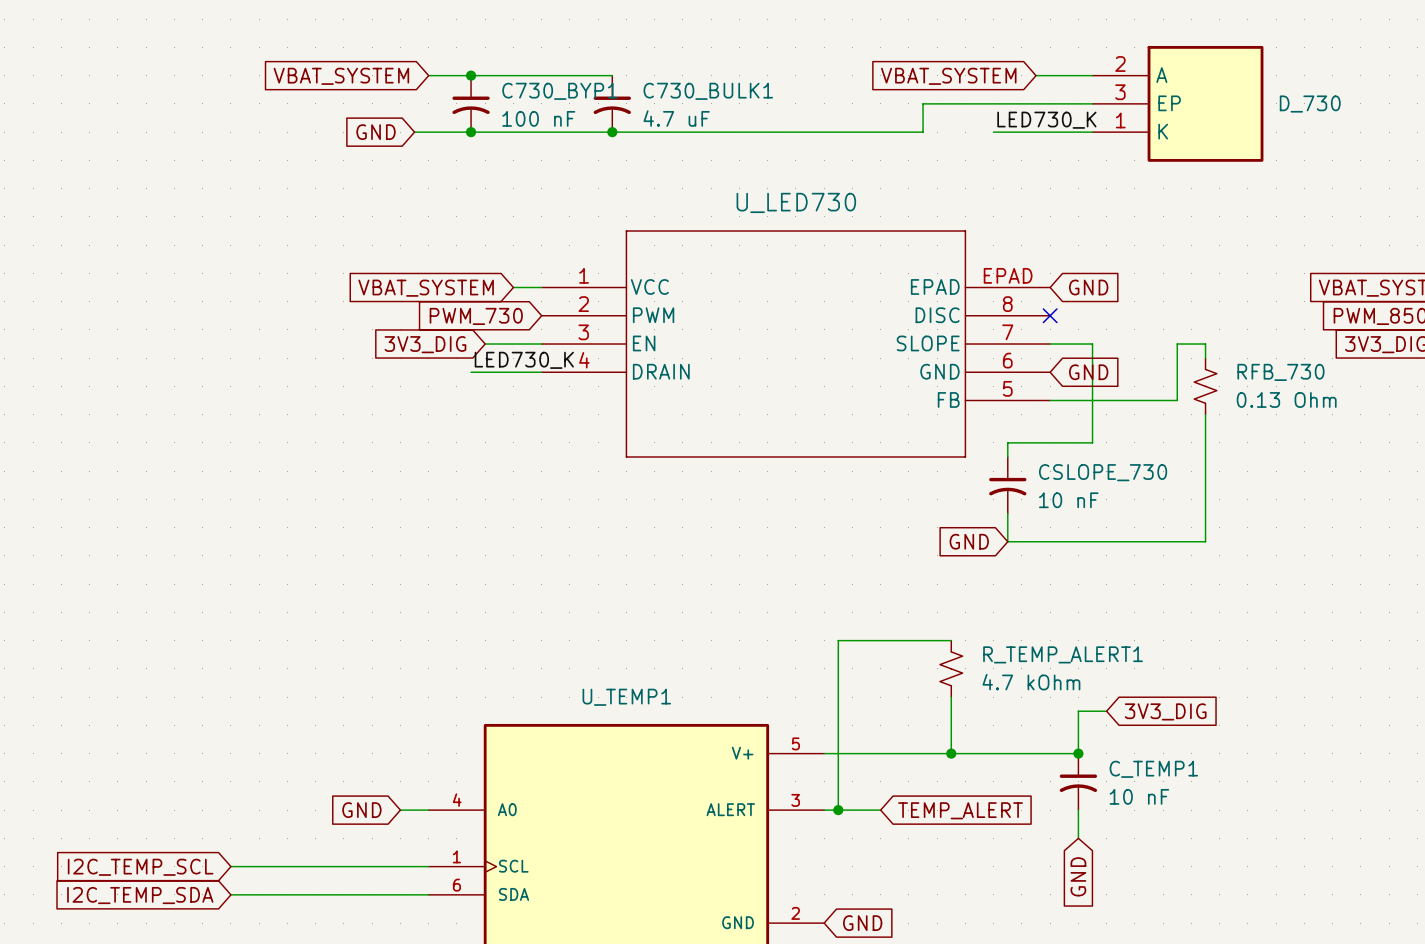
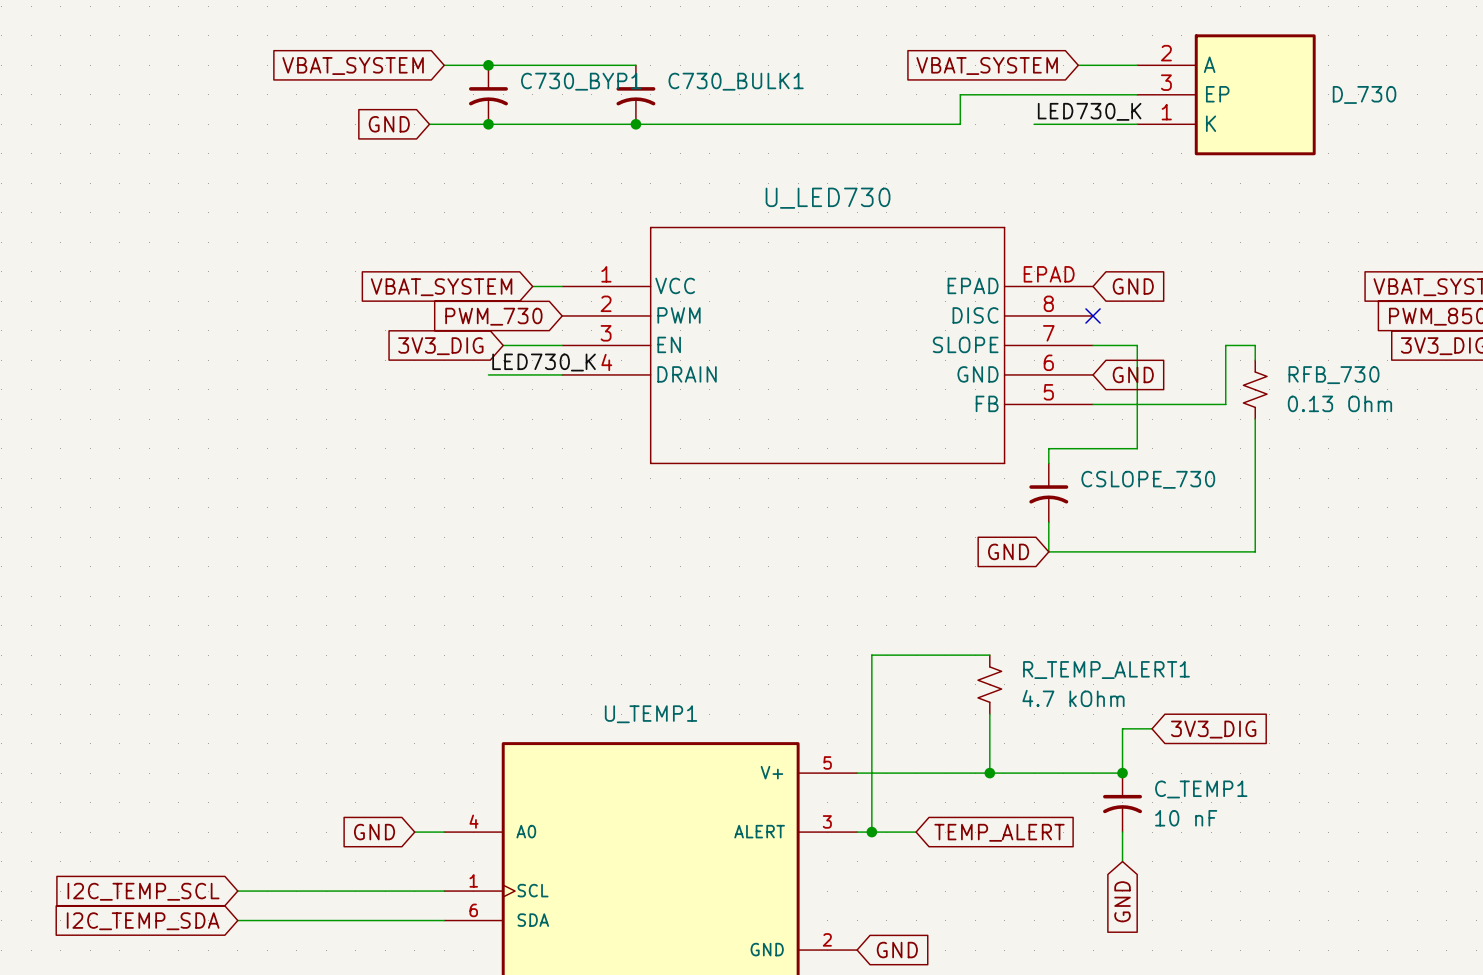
C730_BYP1 value: 100 nF (538, 118) -> none
C730_BULK1 value: 4.7 uF (676, 118) -> none
CSLOPE_730 value: 10 nF (1068, 500) -> none

